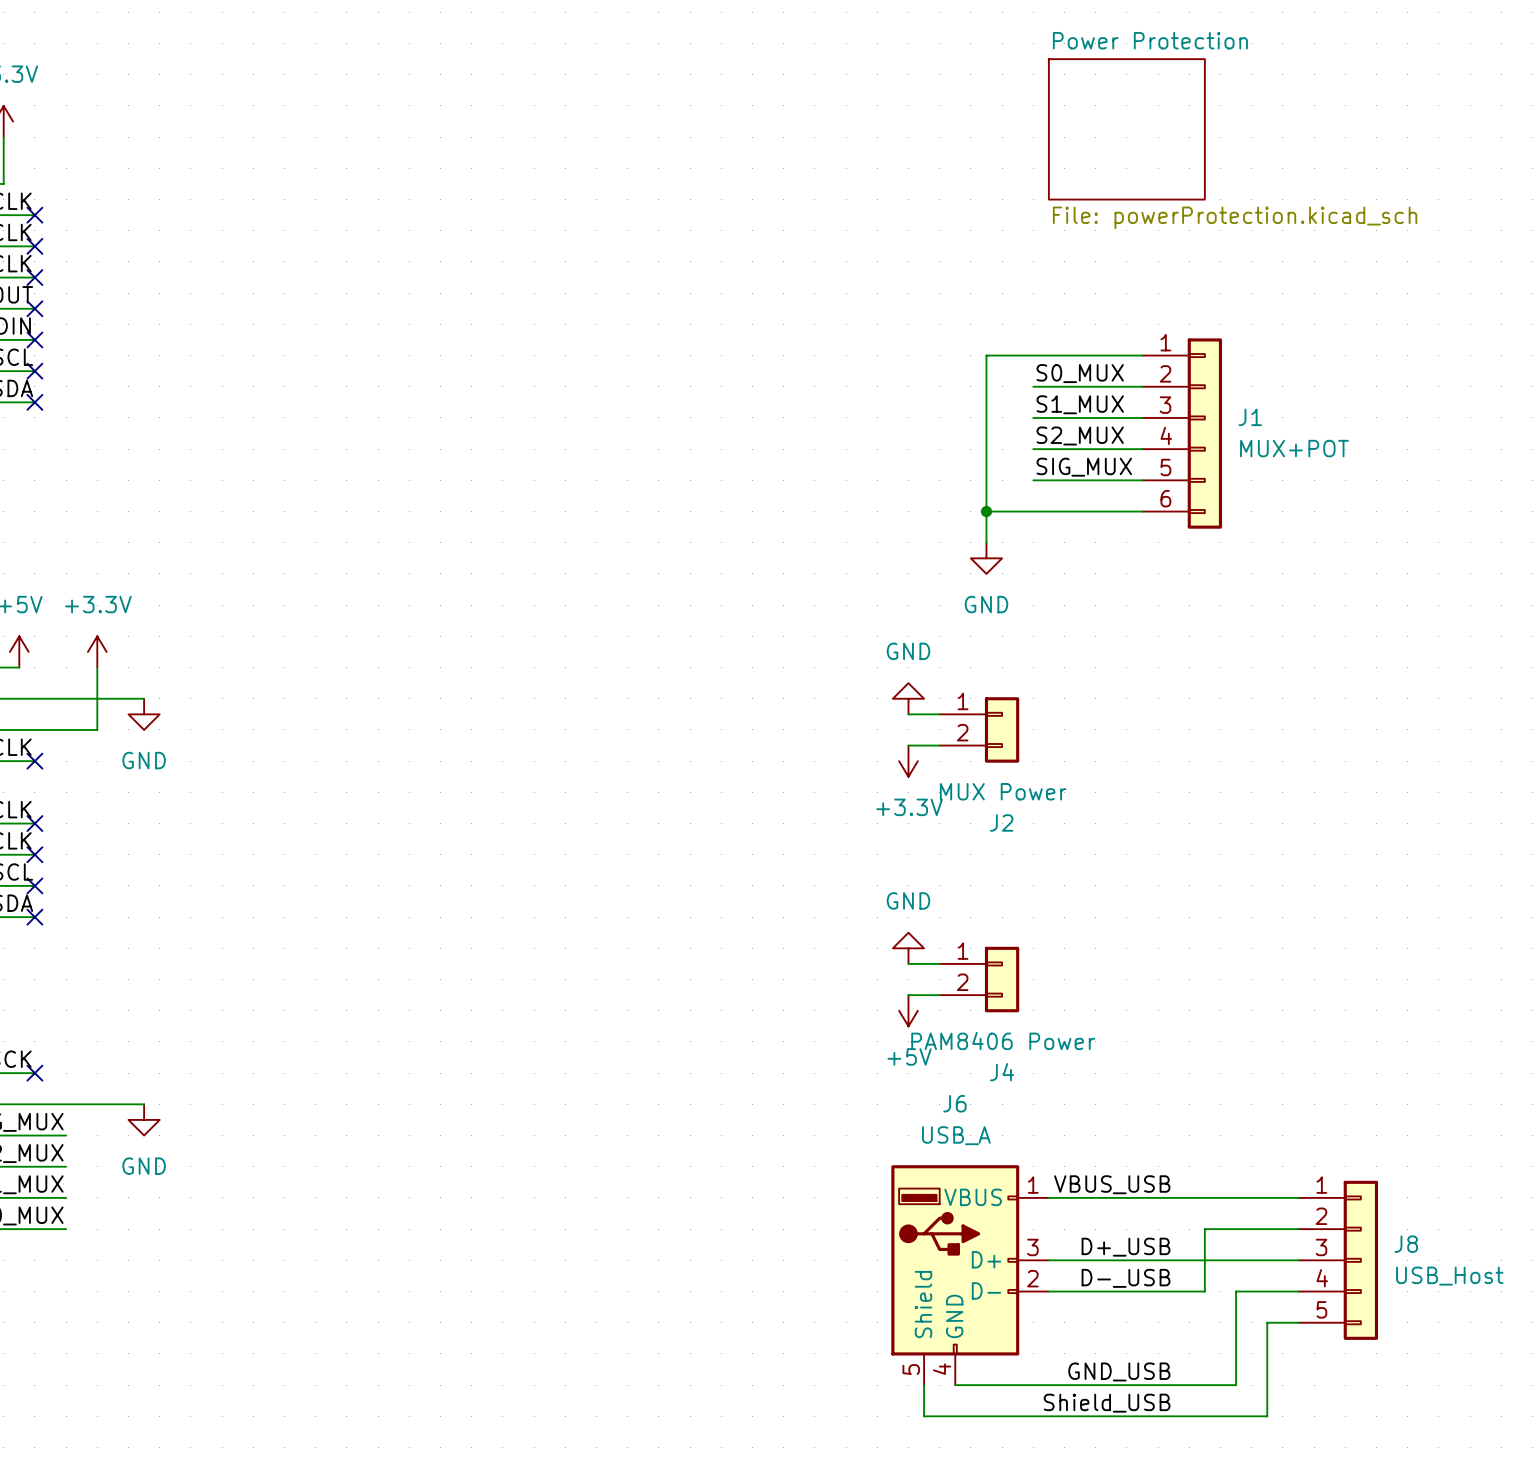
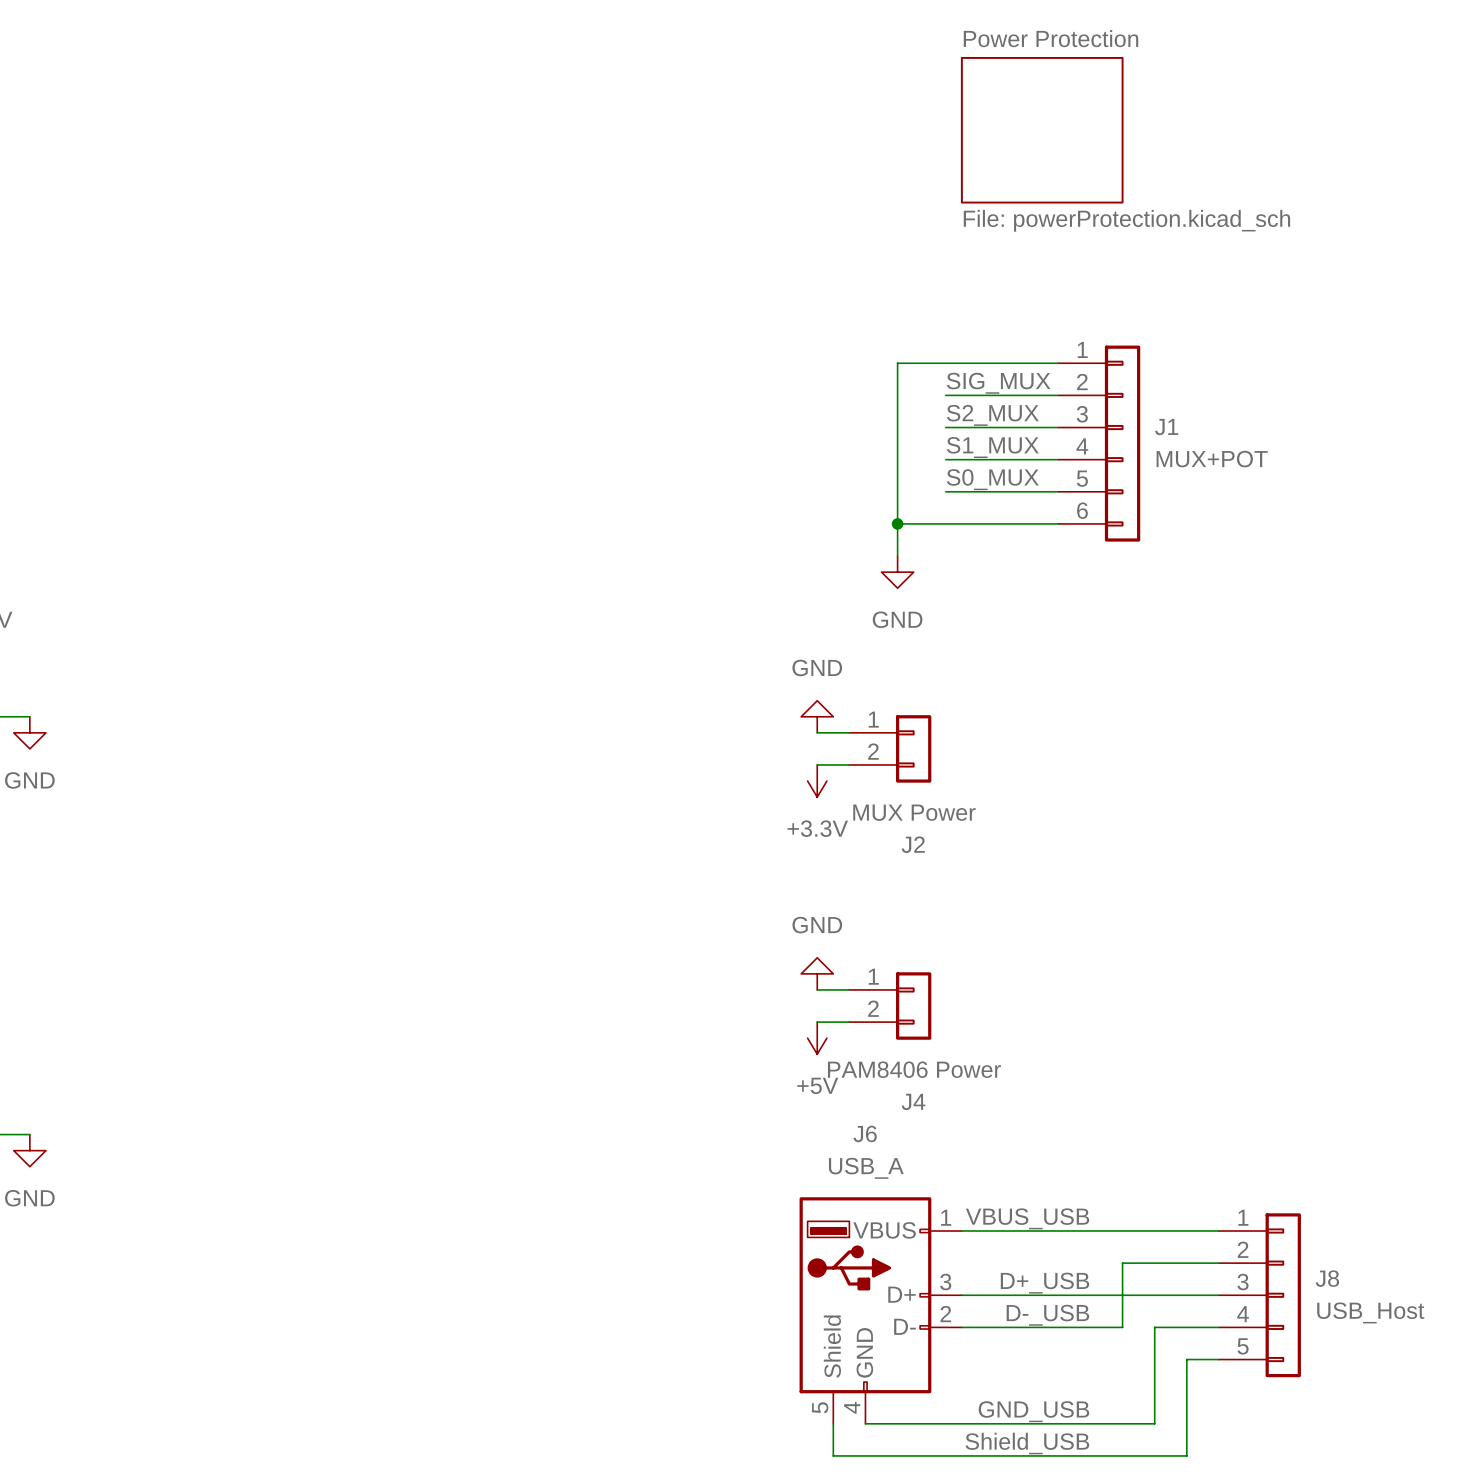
label: S0_MUX (1080, 373) -> SIG_MUX (998, 383)
label: S1_MUX (1080, 404) -> S2_MUX (992, 415)
label: S2_MUX (1080, 435) -> S1_MUX (992, 447)
label: SIG_MUX (1084, 467) -> S0_MUX (992, 479)

